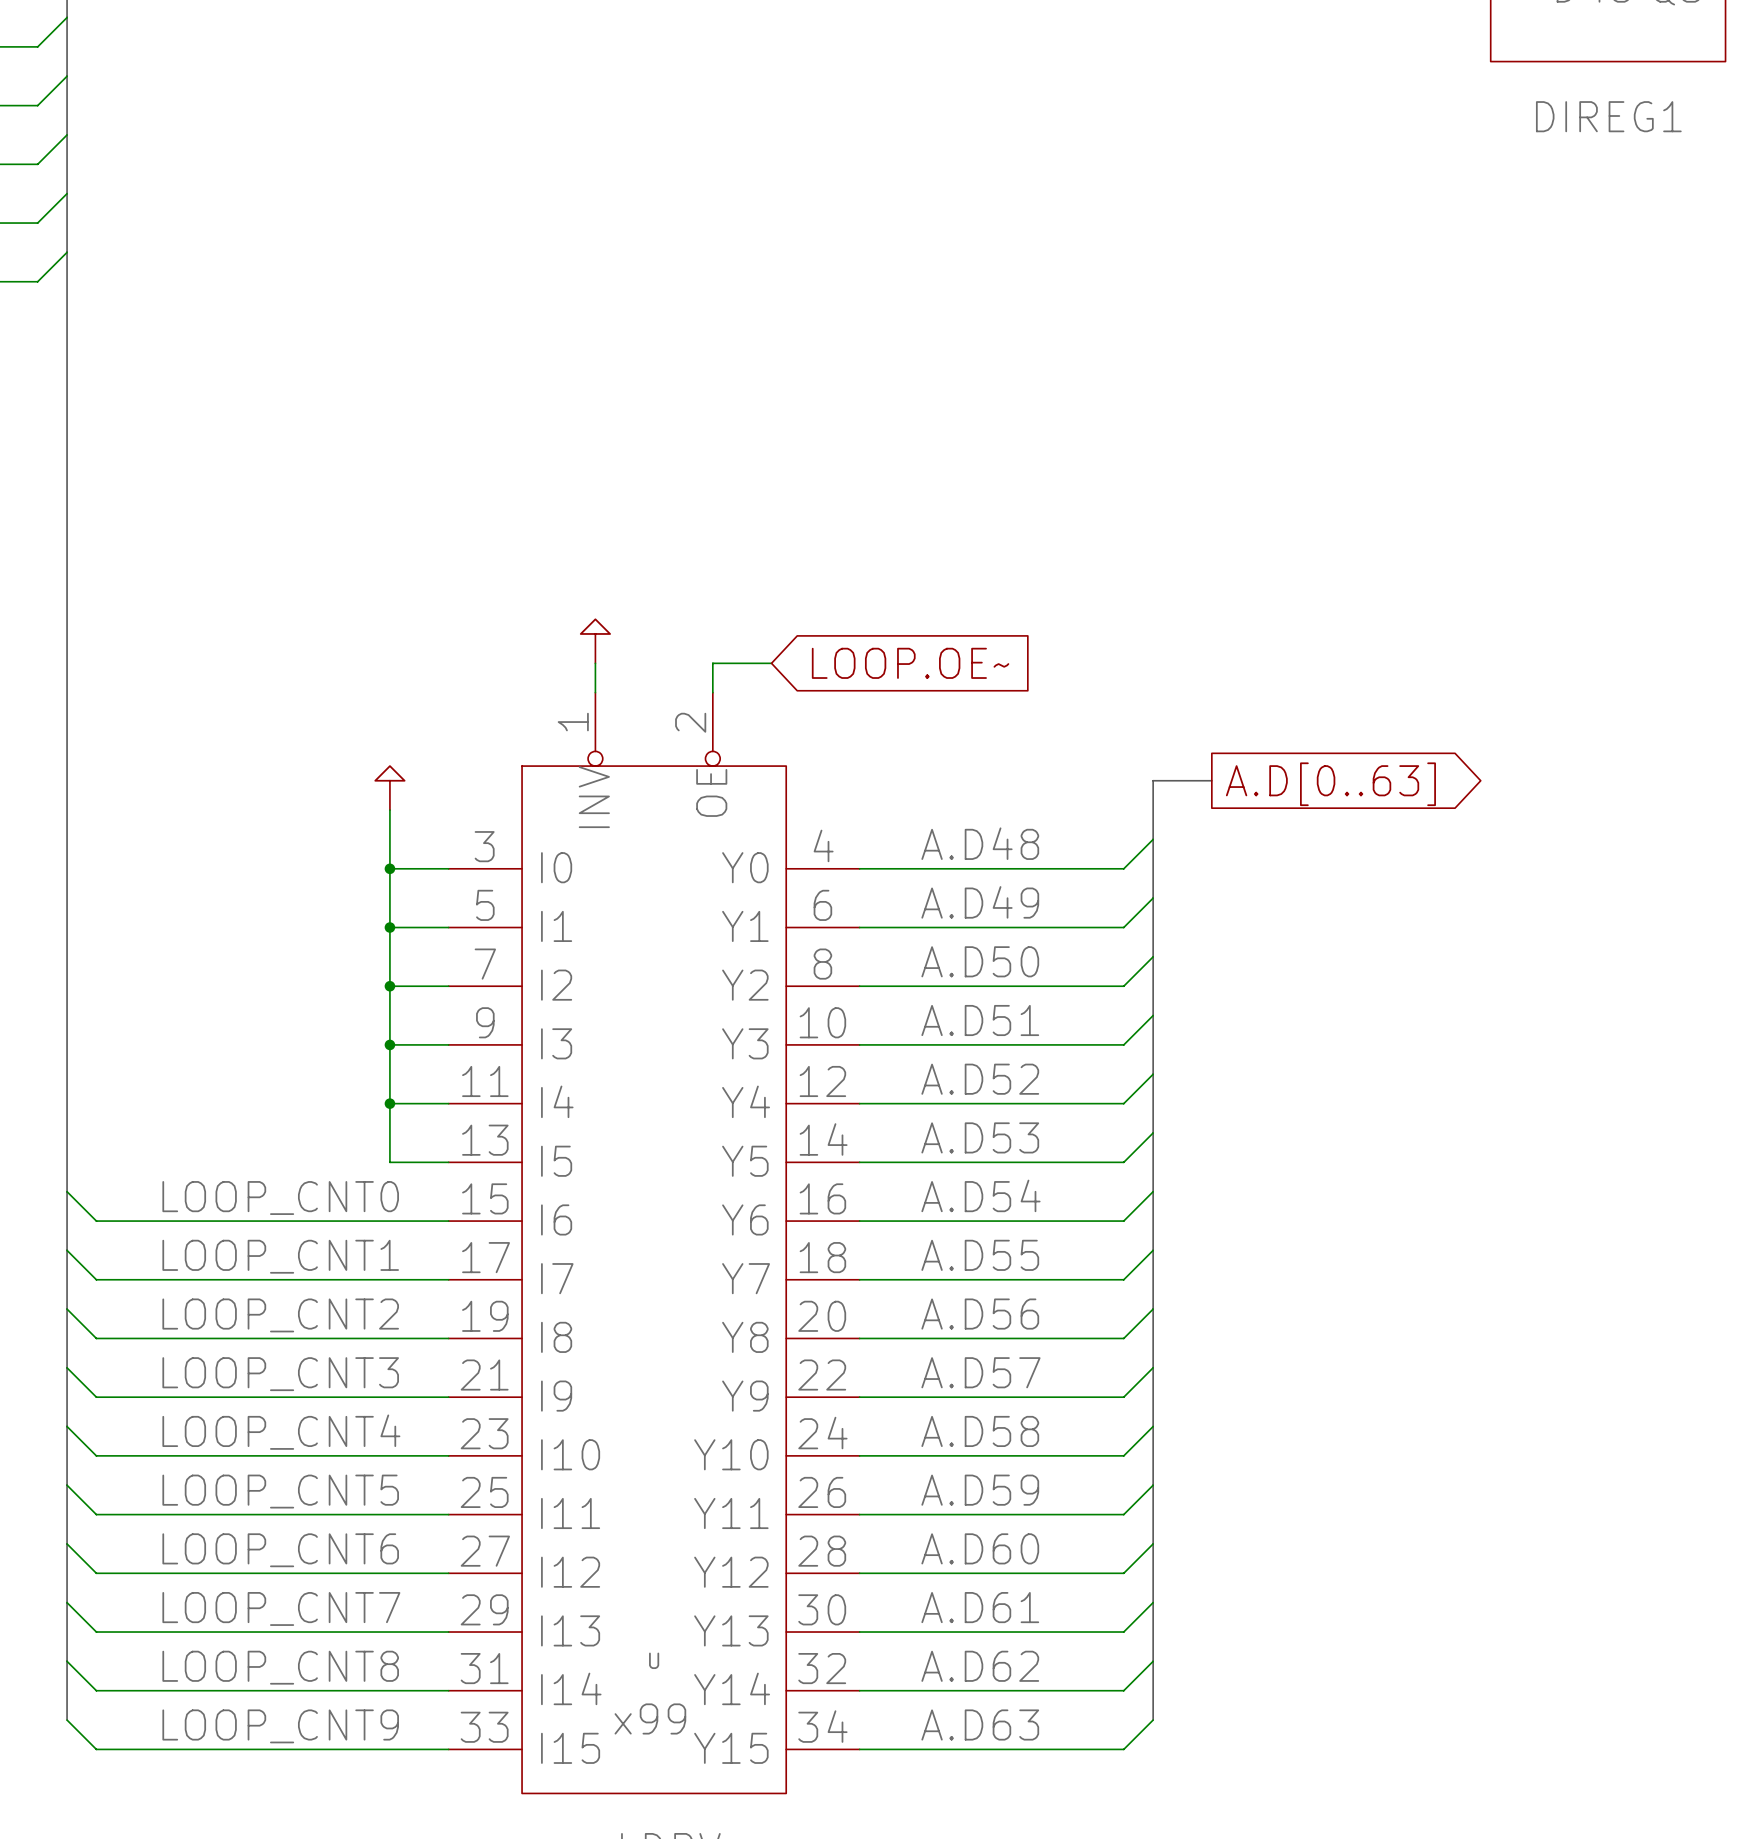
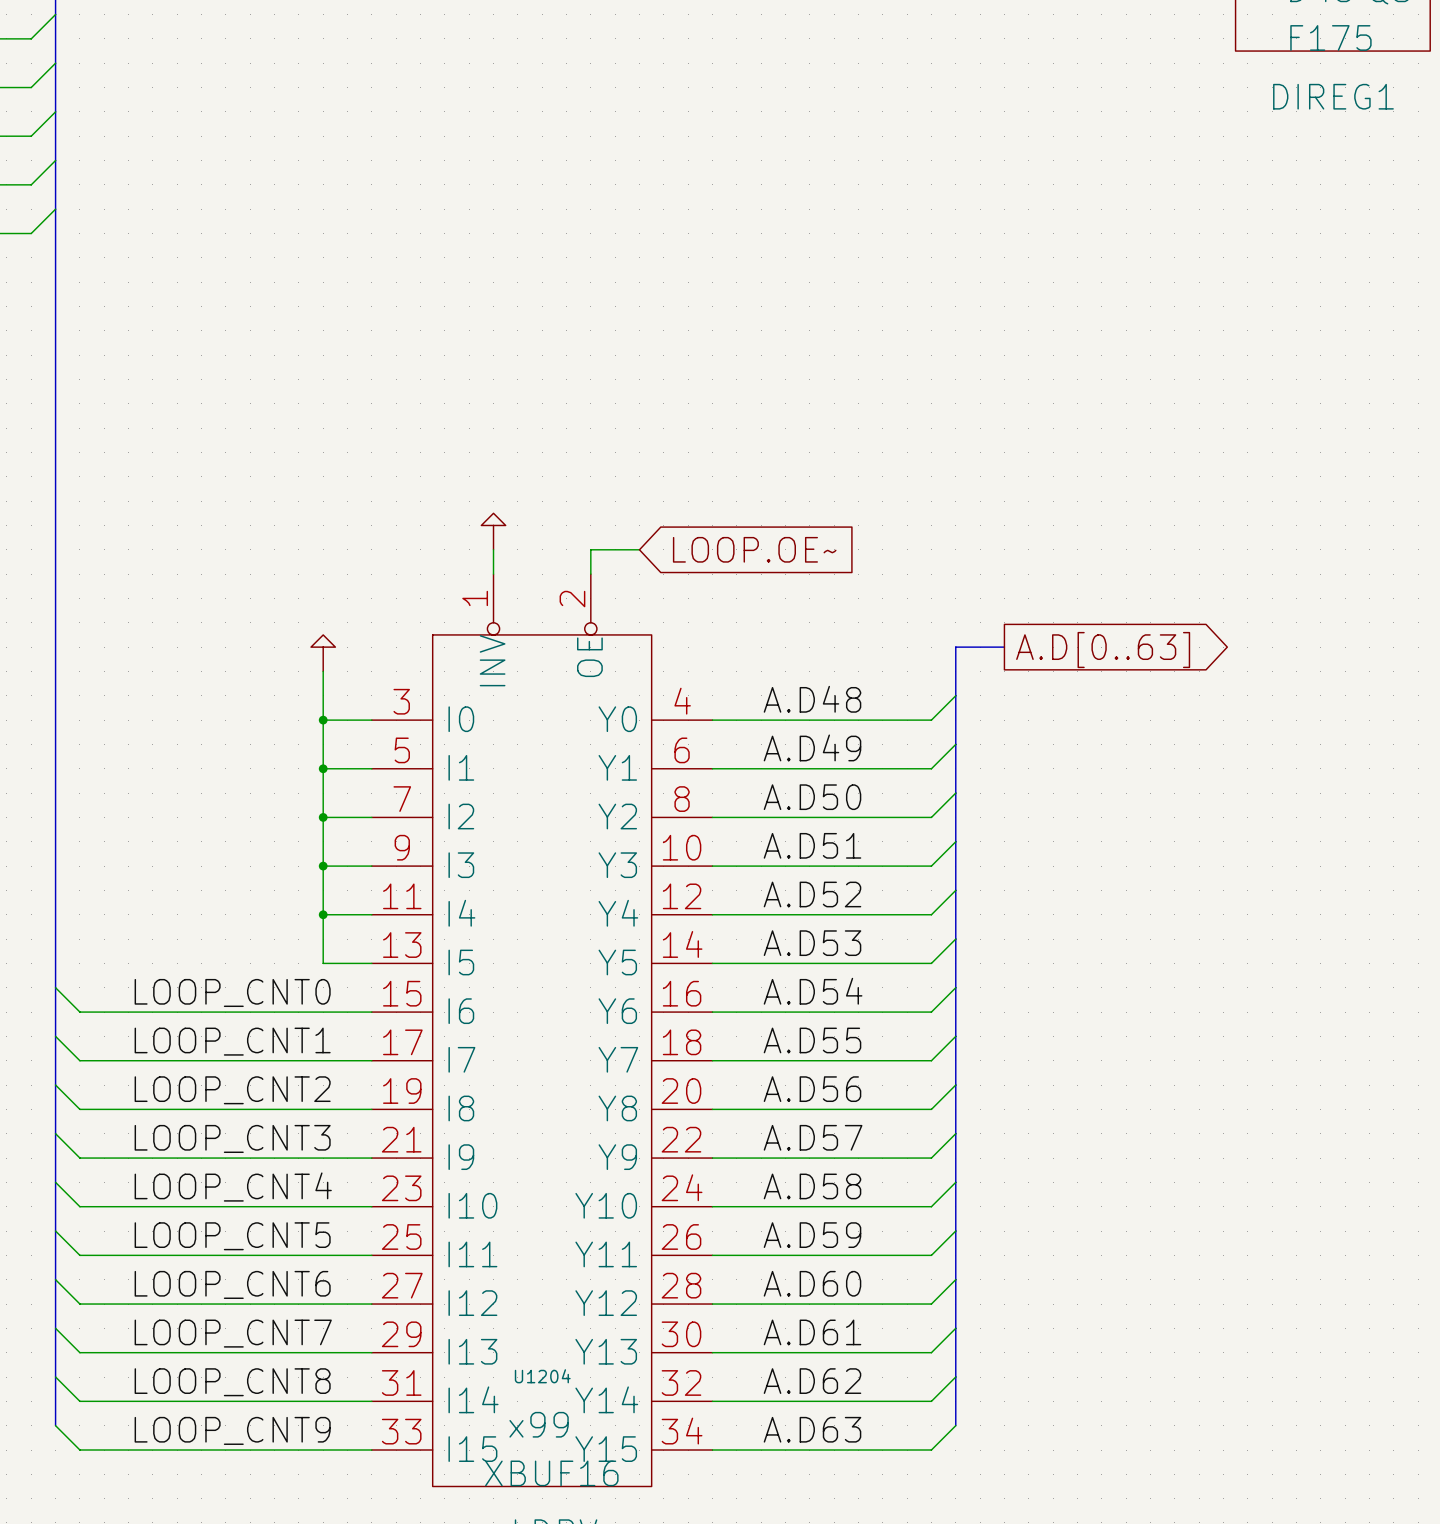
part value: none -> F175 (1330, 37)
U name: U (654, 1660) -> U1204 (542, 1376)
U value: none -> XBUF16 (551, 1473)

